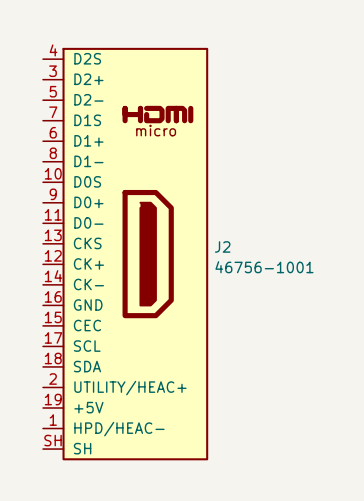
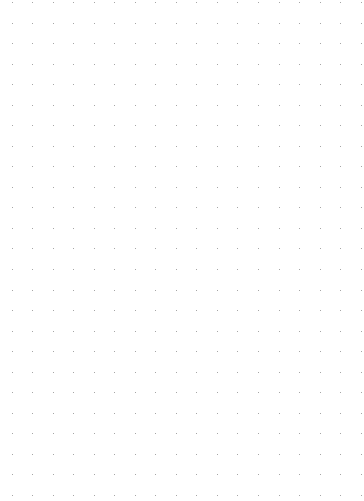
J2: 46756-1001 (125, 254) -> none

